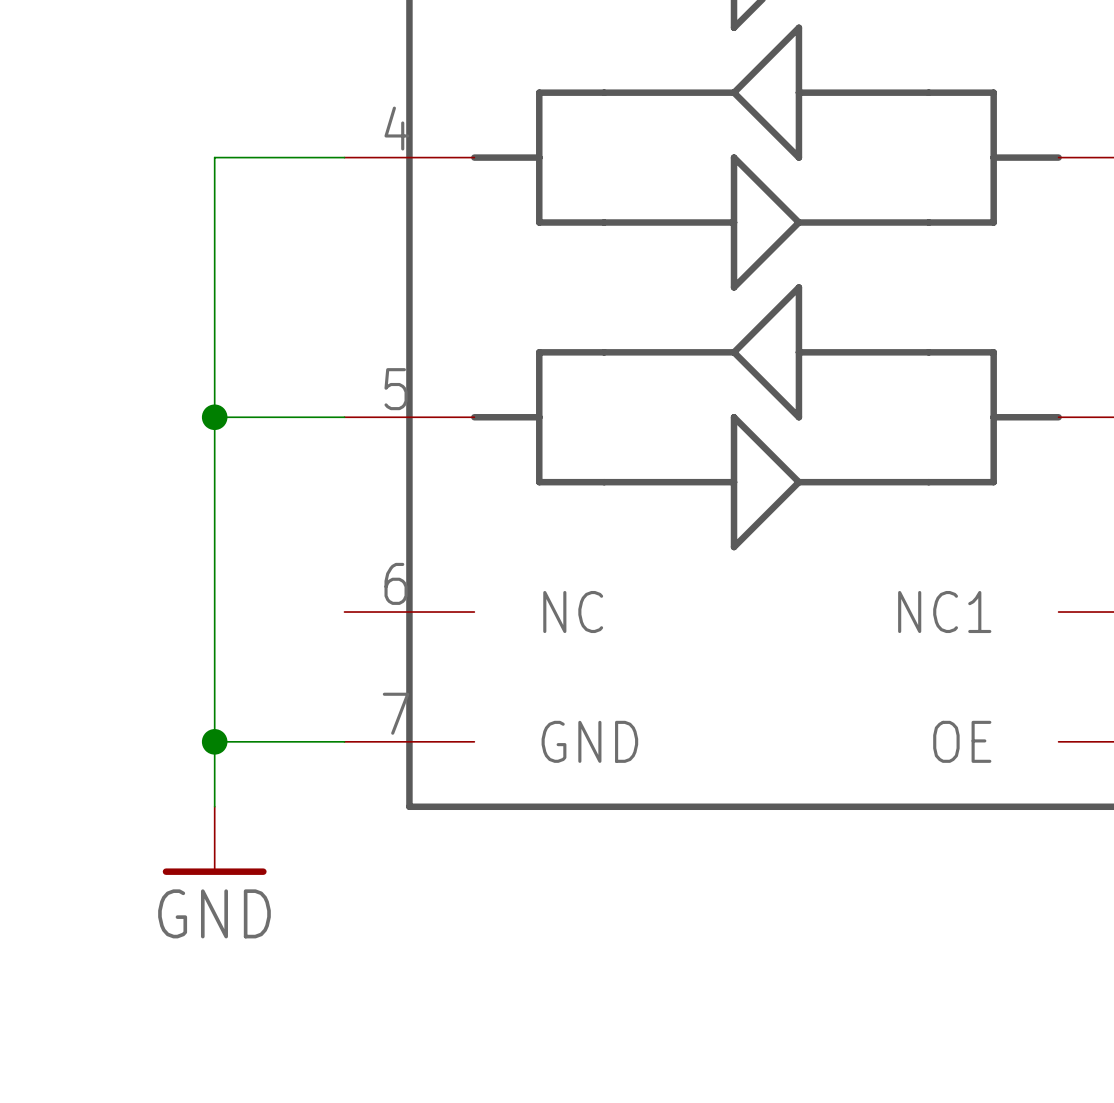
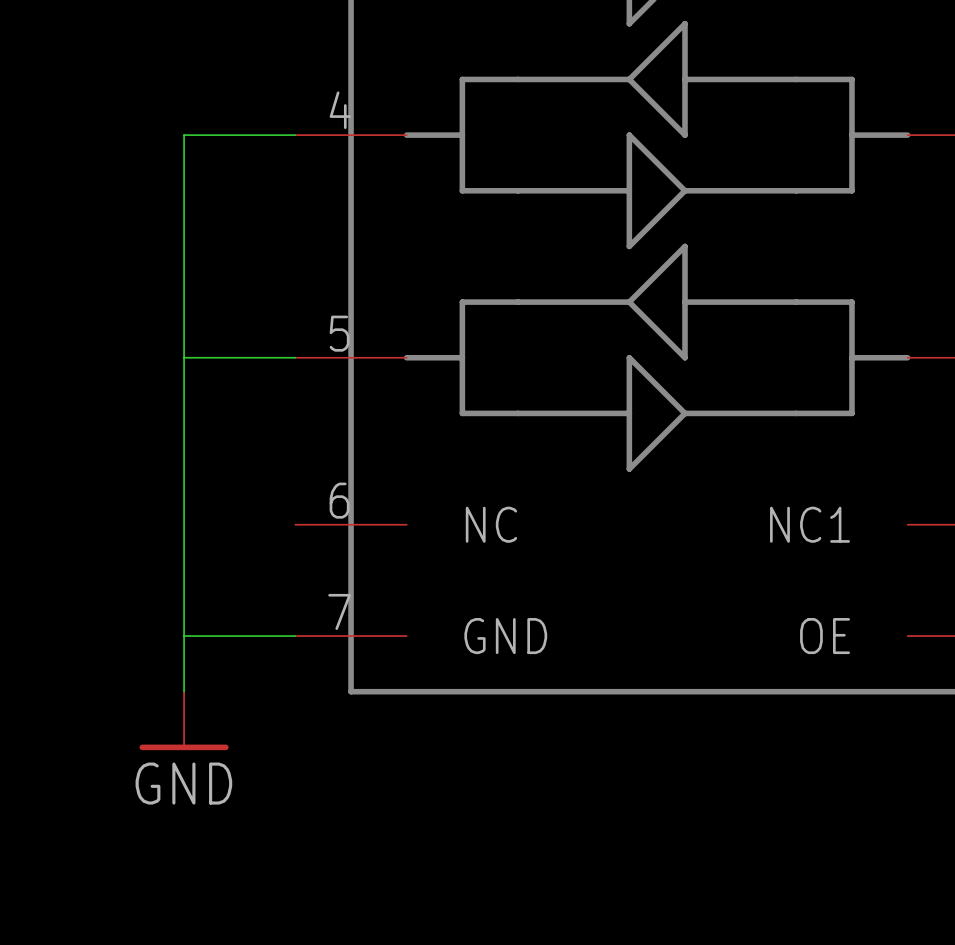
junction: (214, 417) -> none
junction: (214, 741) -> none

